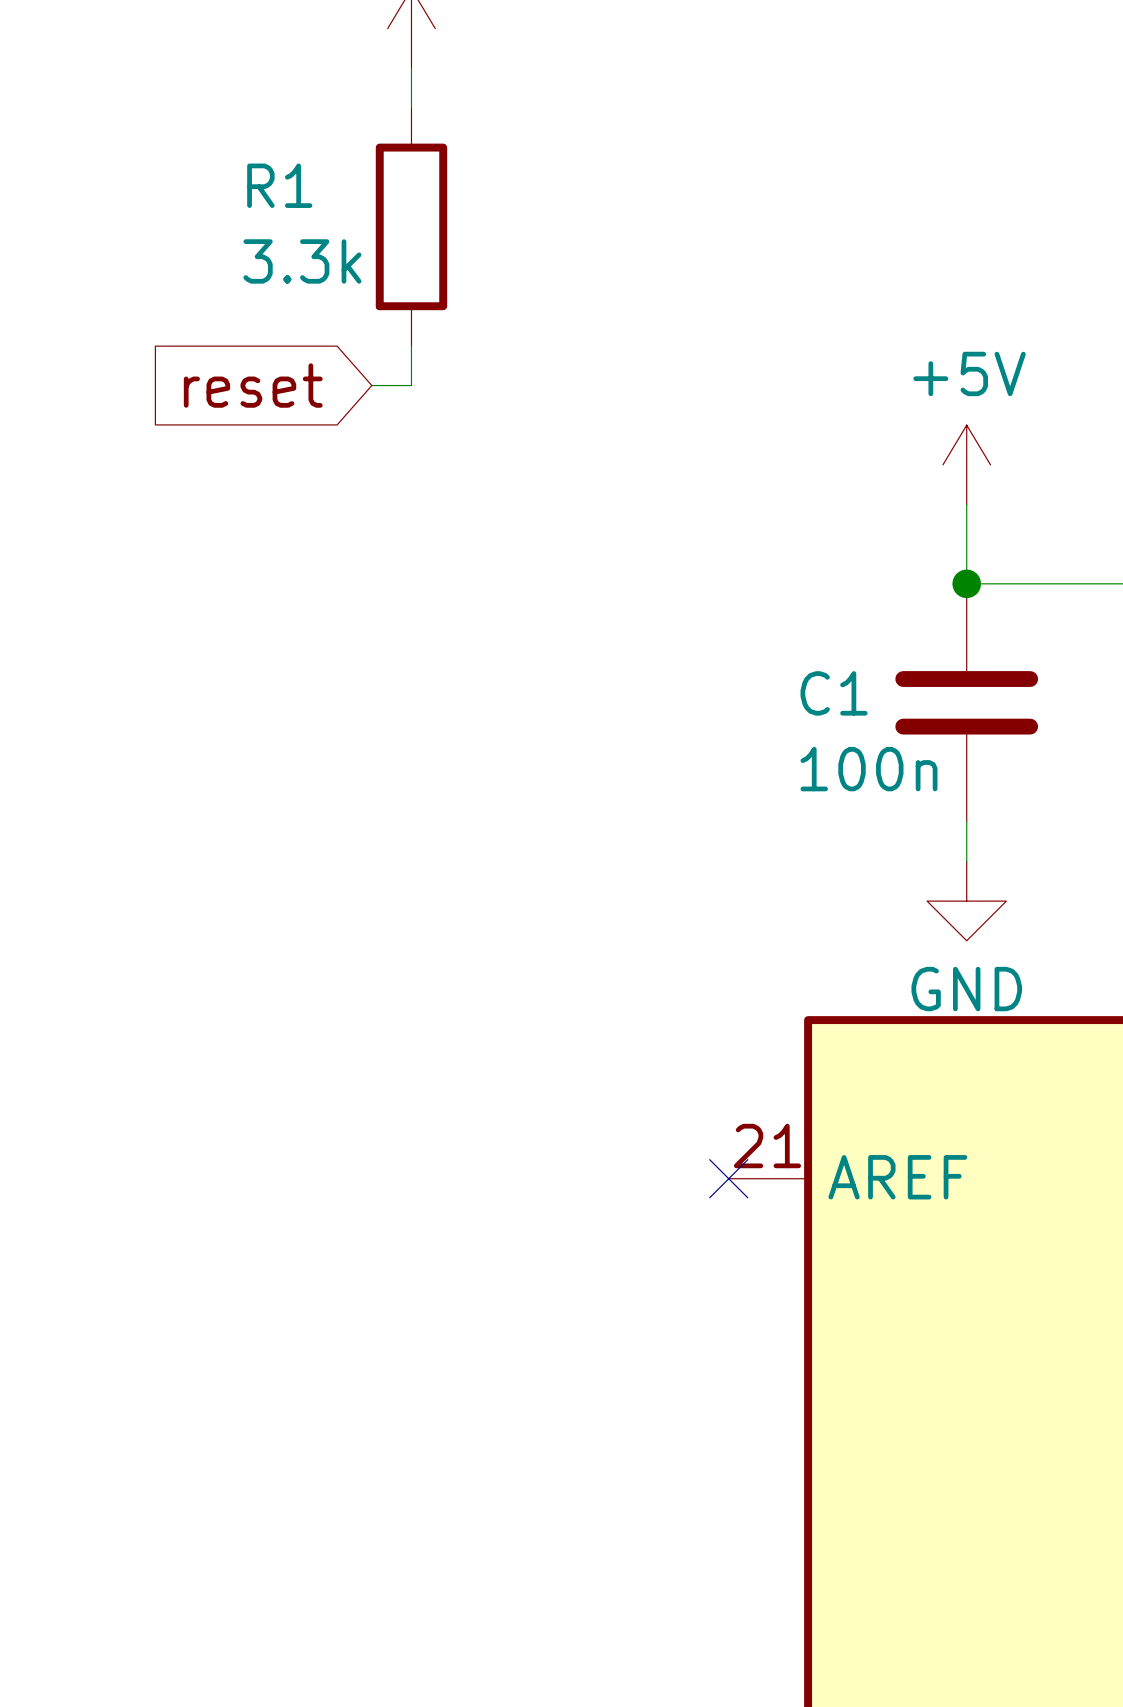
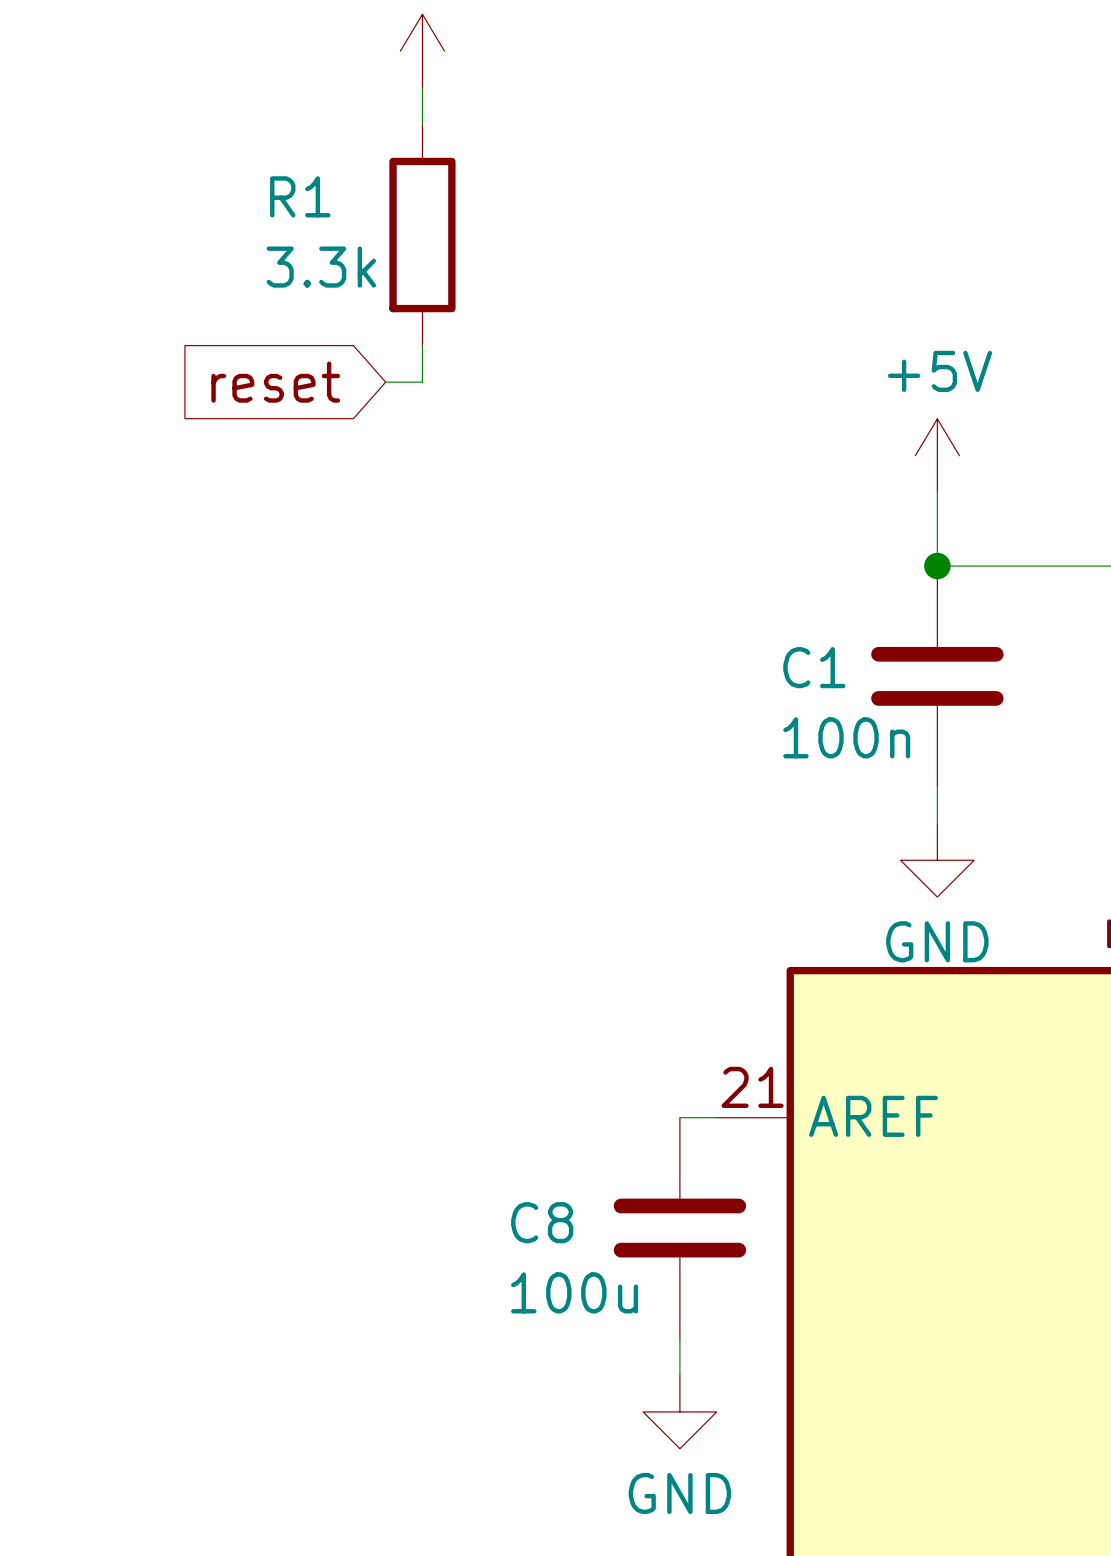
wire: none -> (679, 1117) (716, 1117)
no-connect mark: (728, 1178) -> none
C8: none -> 100u (679, 1228)
wire: none -> (679, 1338) (679, 1375)
power symbol: none -> GND (679, 1411)

